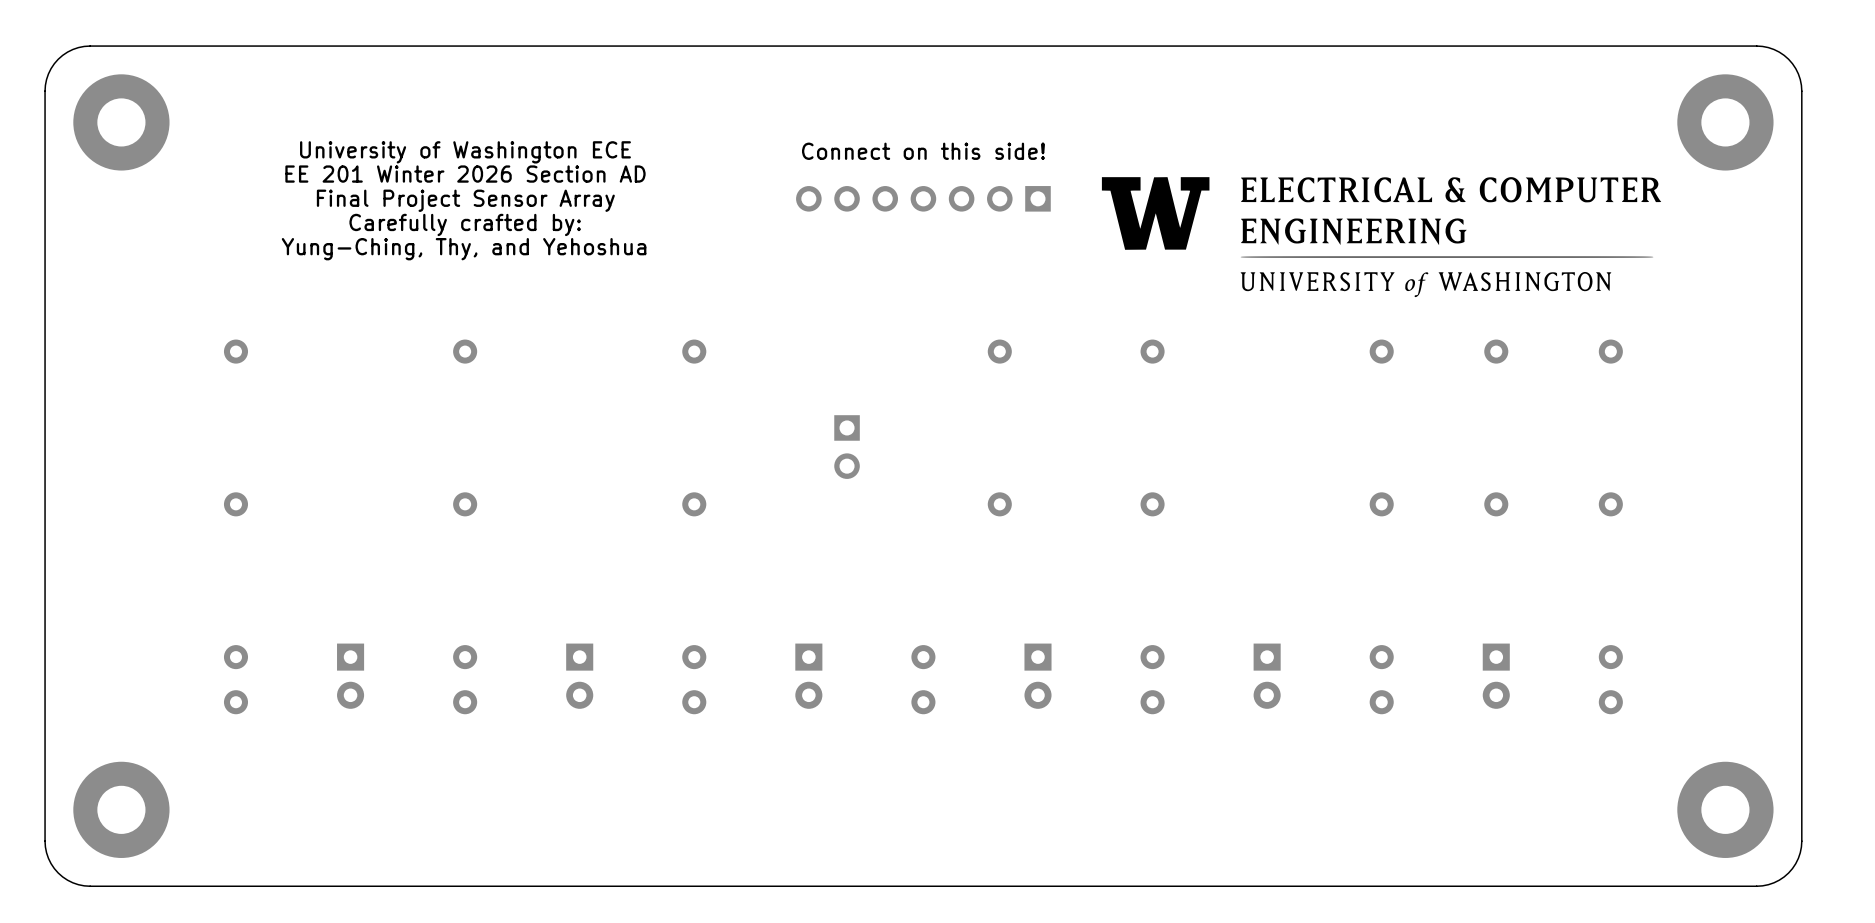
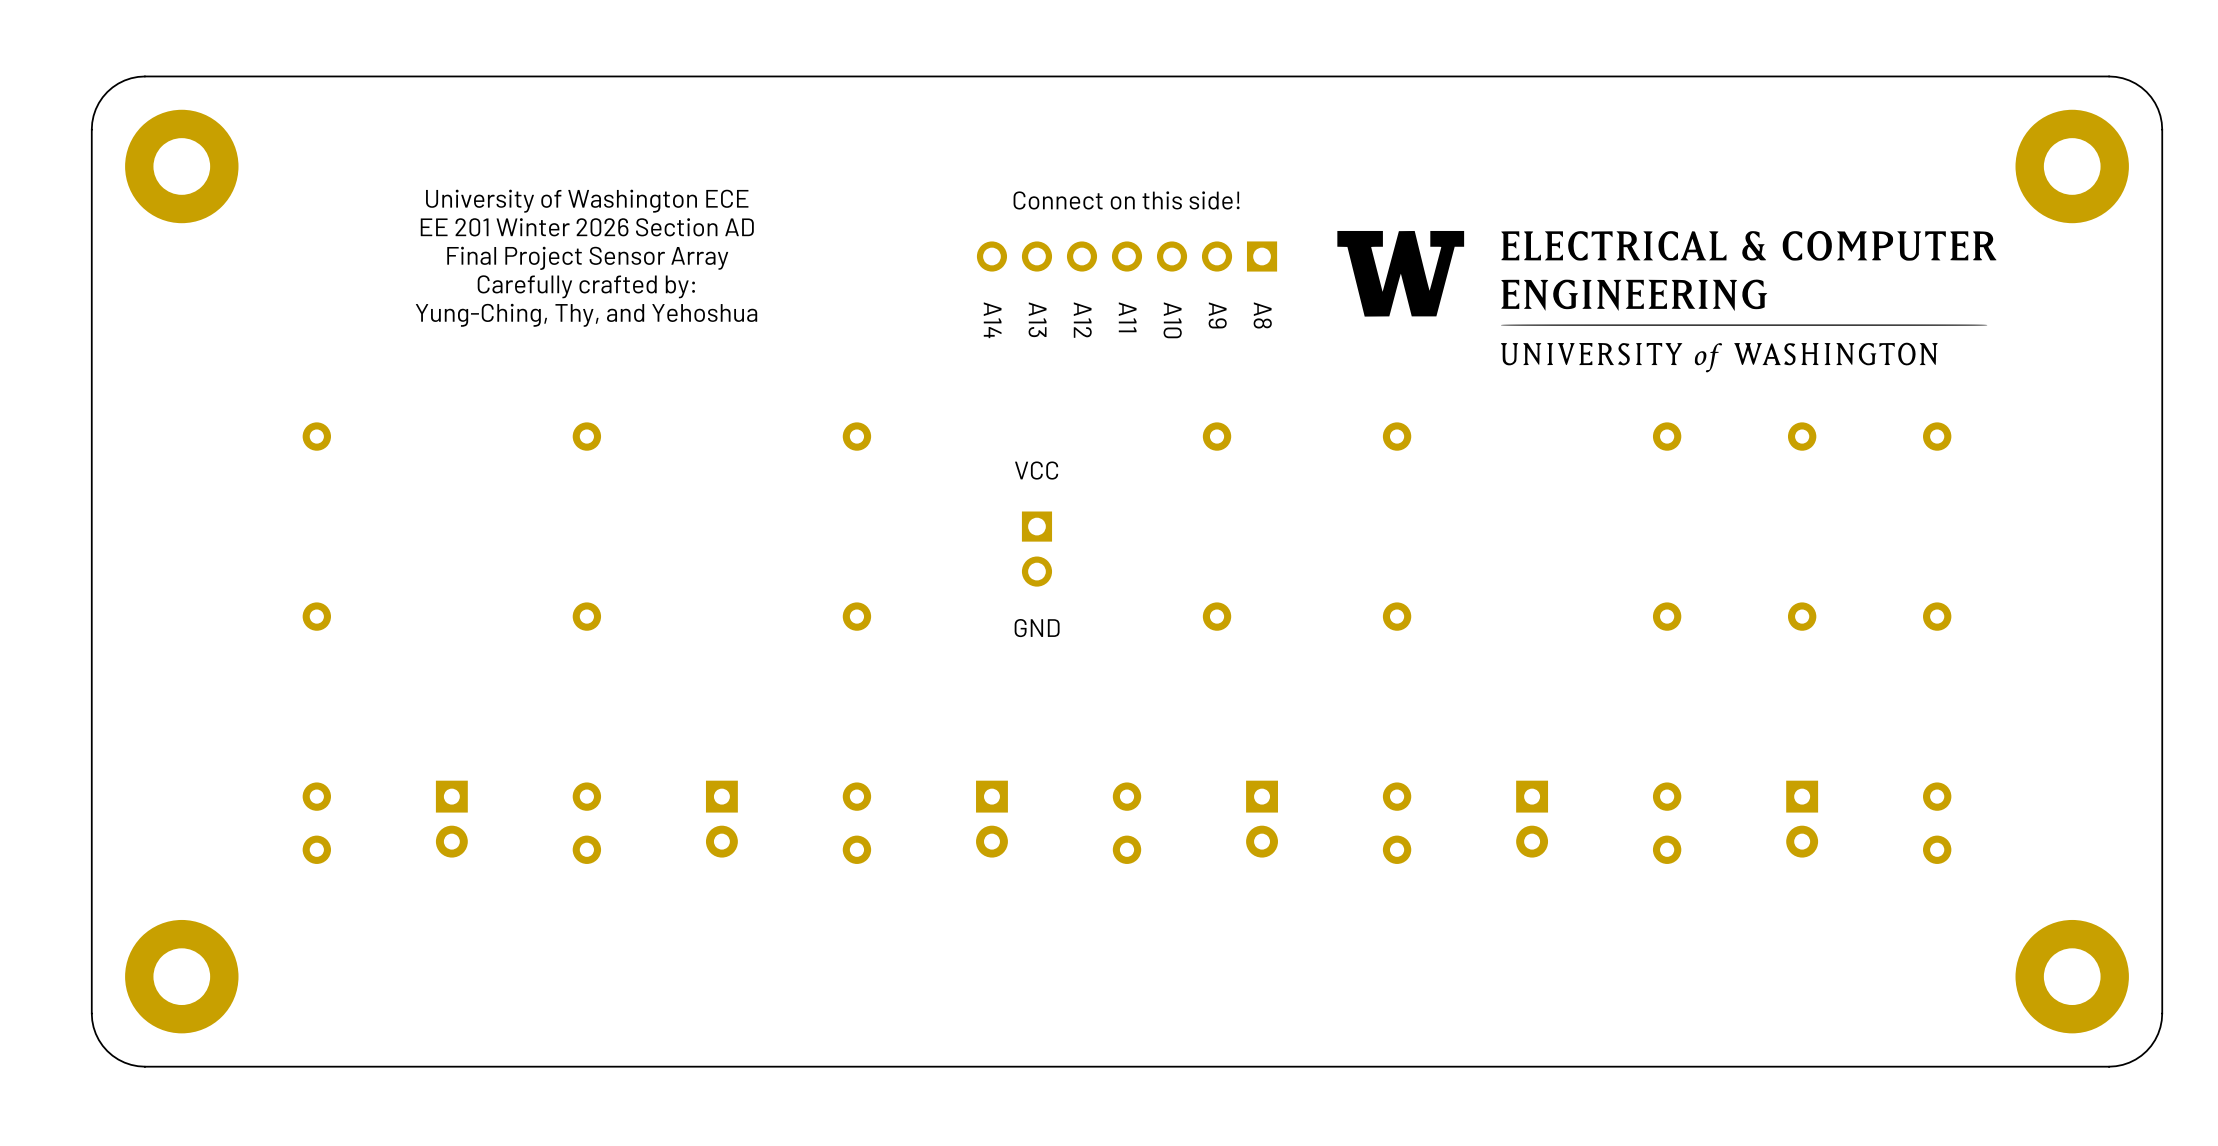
text: none -> A9 (1217, 315)
text: none -> A8 (1262, 315)
text: none -> A14 (992, 320)
text: none -> A13 (1037, 319)
text: none -> A12 (1082, 320)
text: none -> A11 (1127, 317)
text: none -> A10 (1172, 320)
text: none -> VCC (1036, 470)
text: none -> GND (1037, 628)

